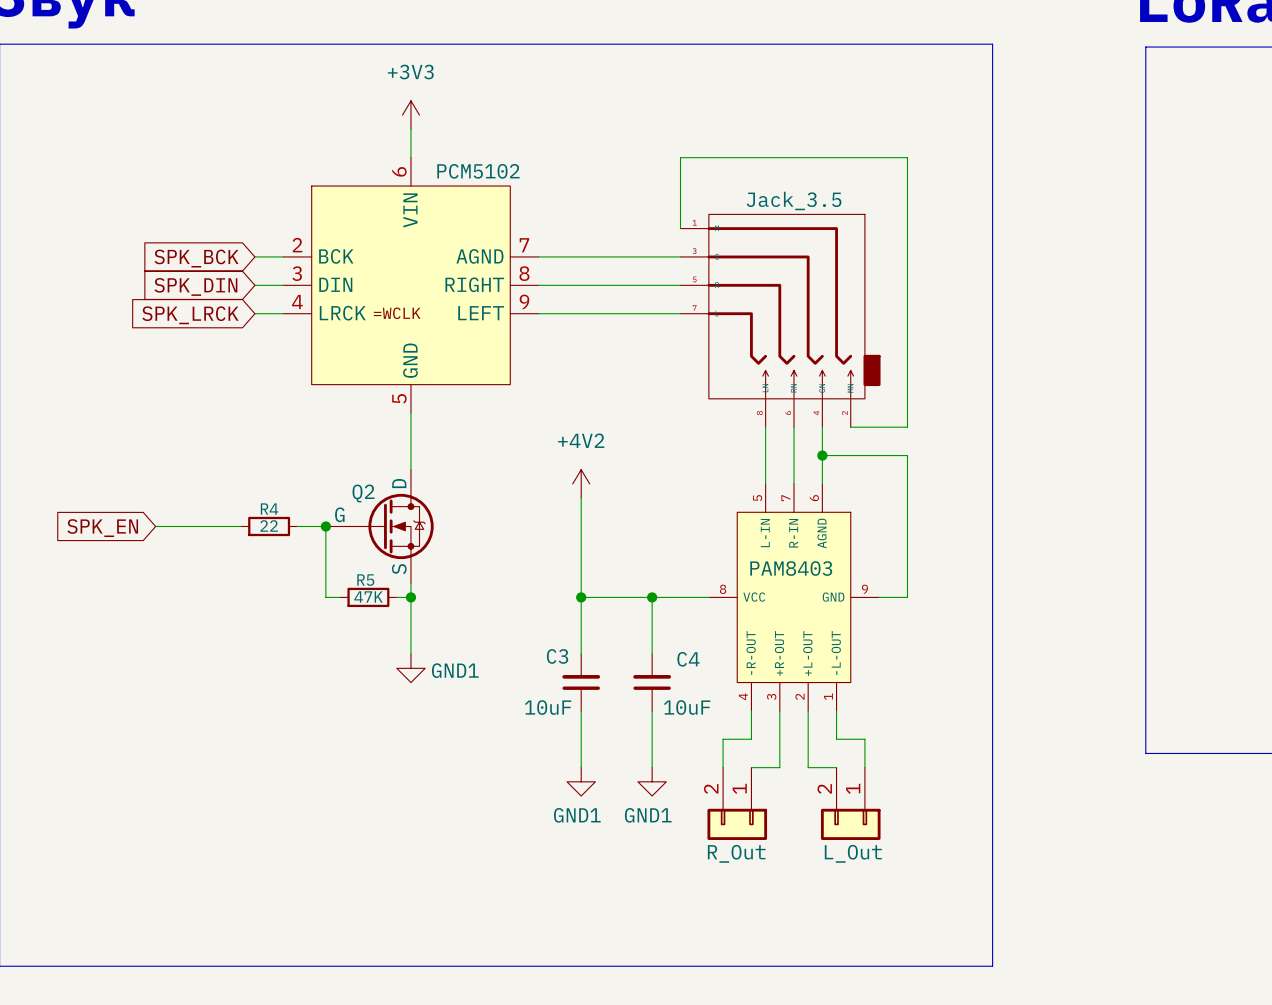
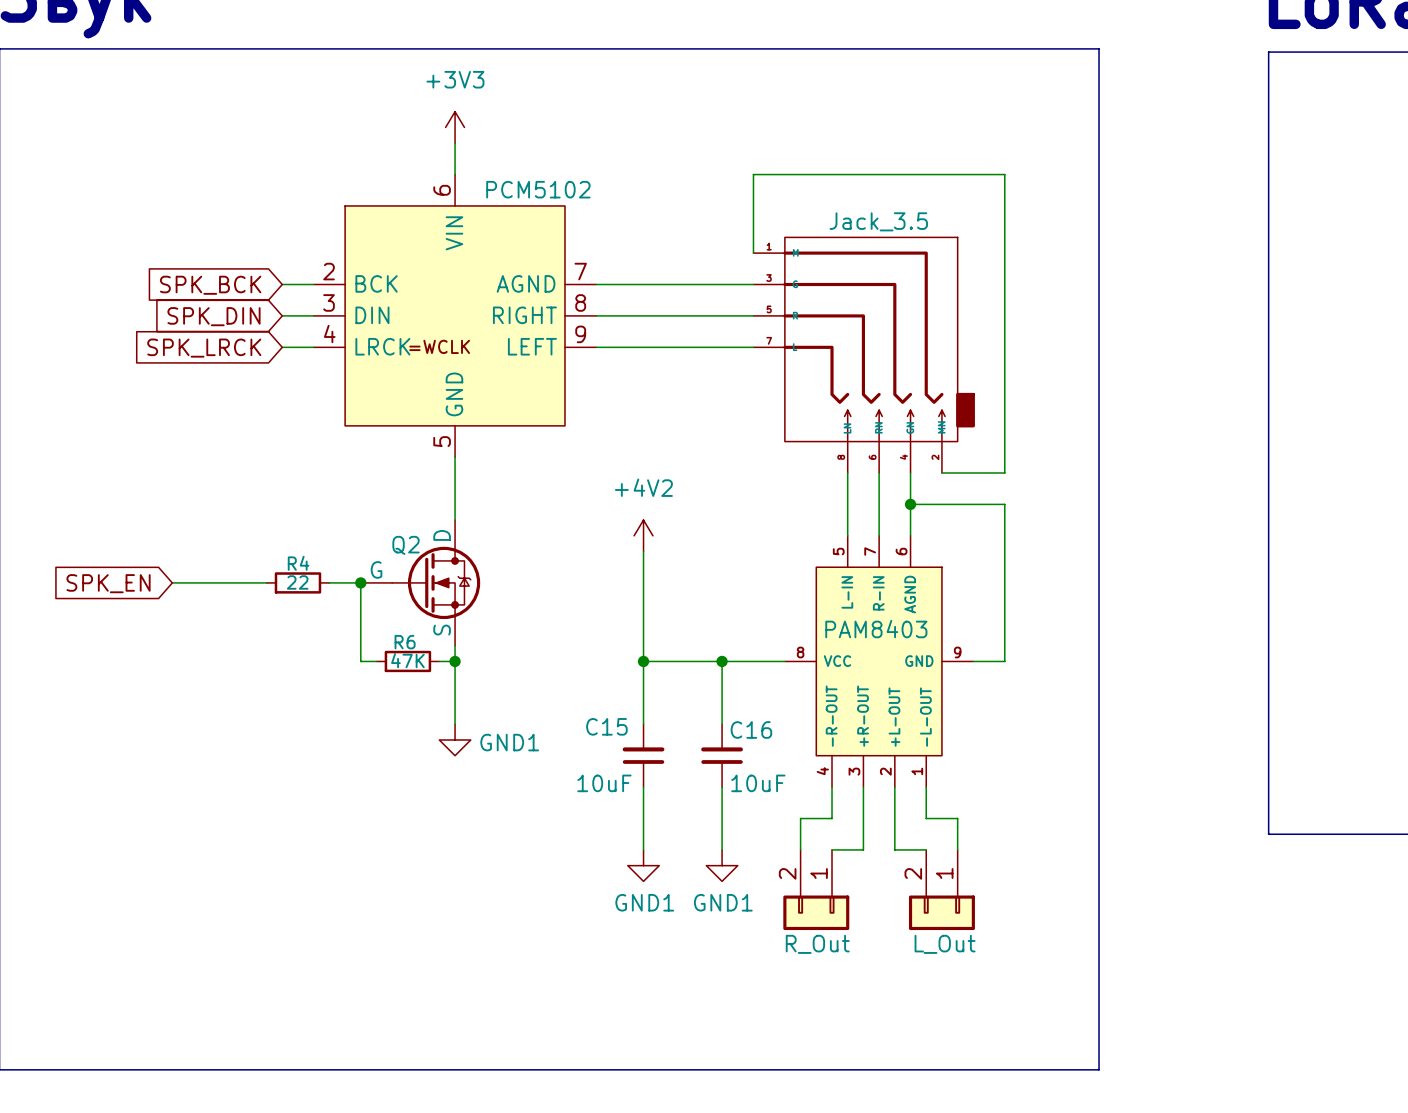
R5 name: R5 (365, 580) -> R6 (405, 642)
C3 name: C3 (557, 656) -> C15 (606, 726)
C4 name: C4 (688, 659) -> C16 (751, 729)

